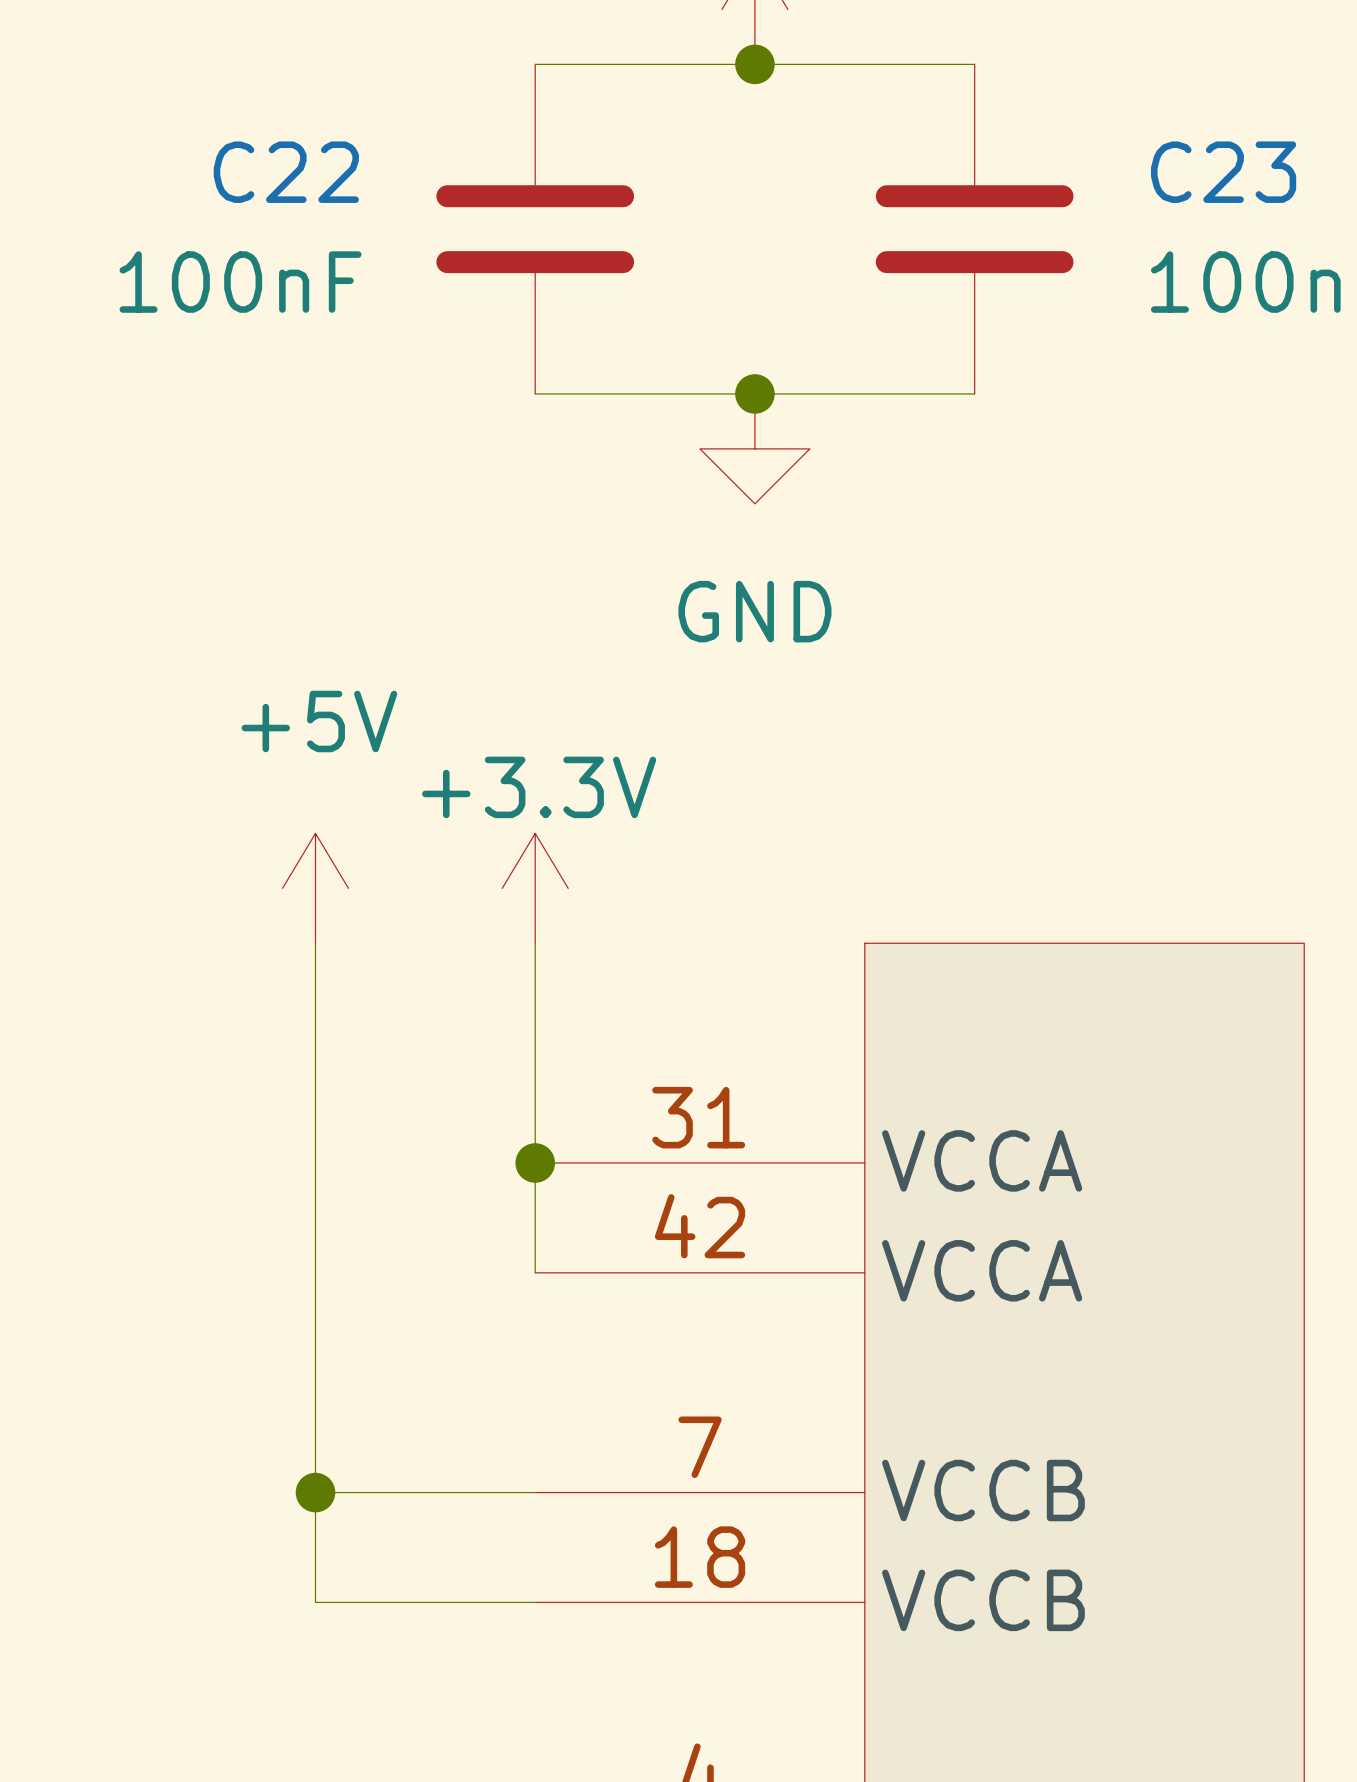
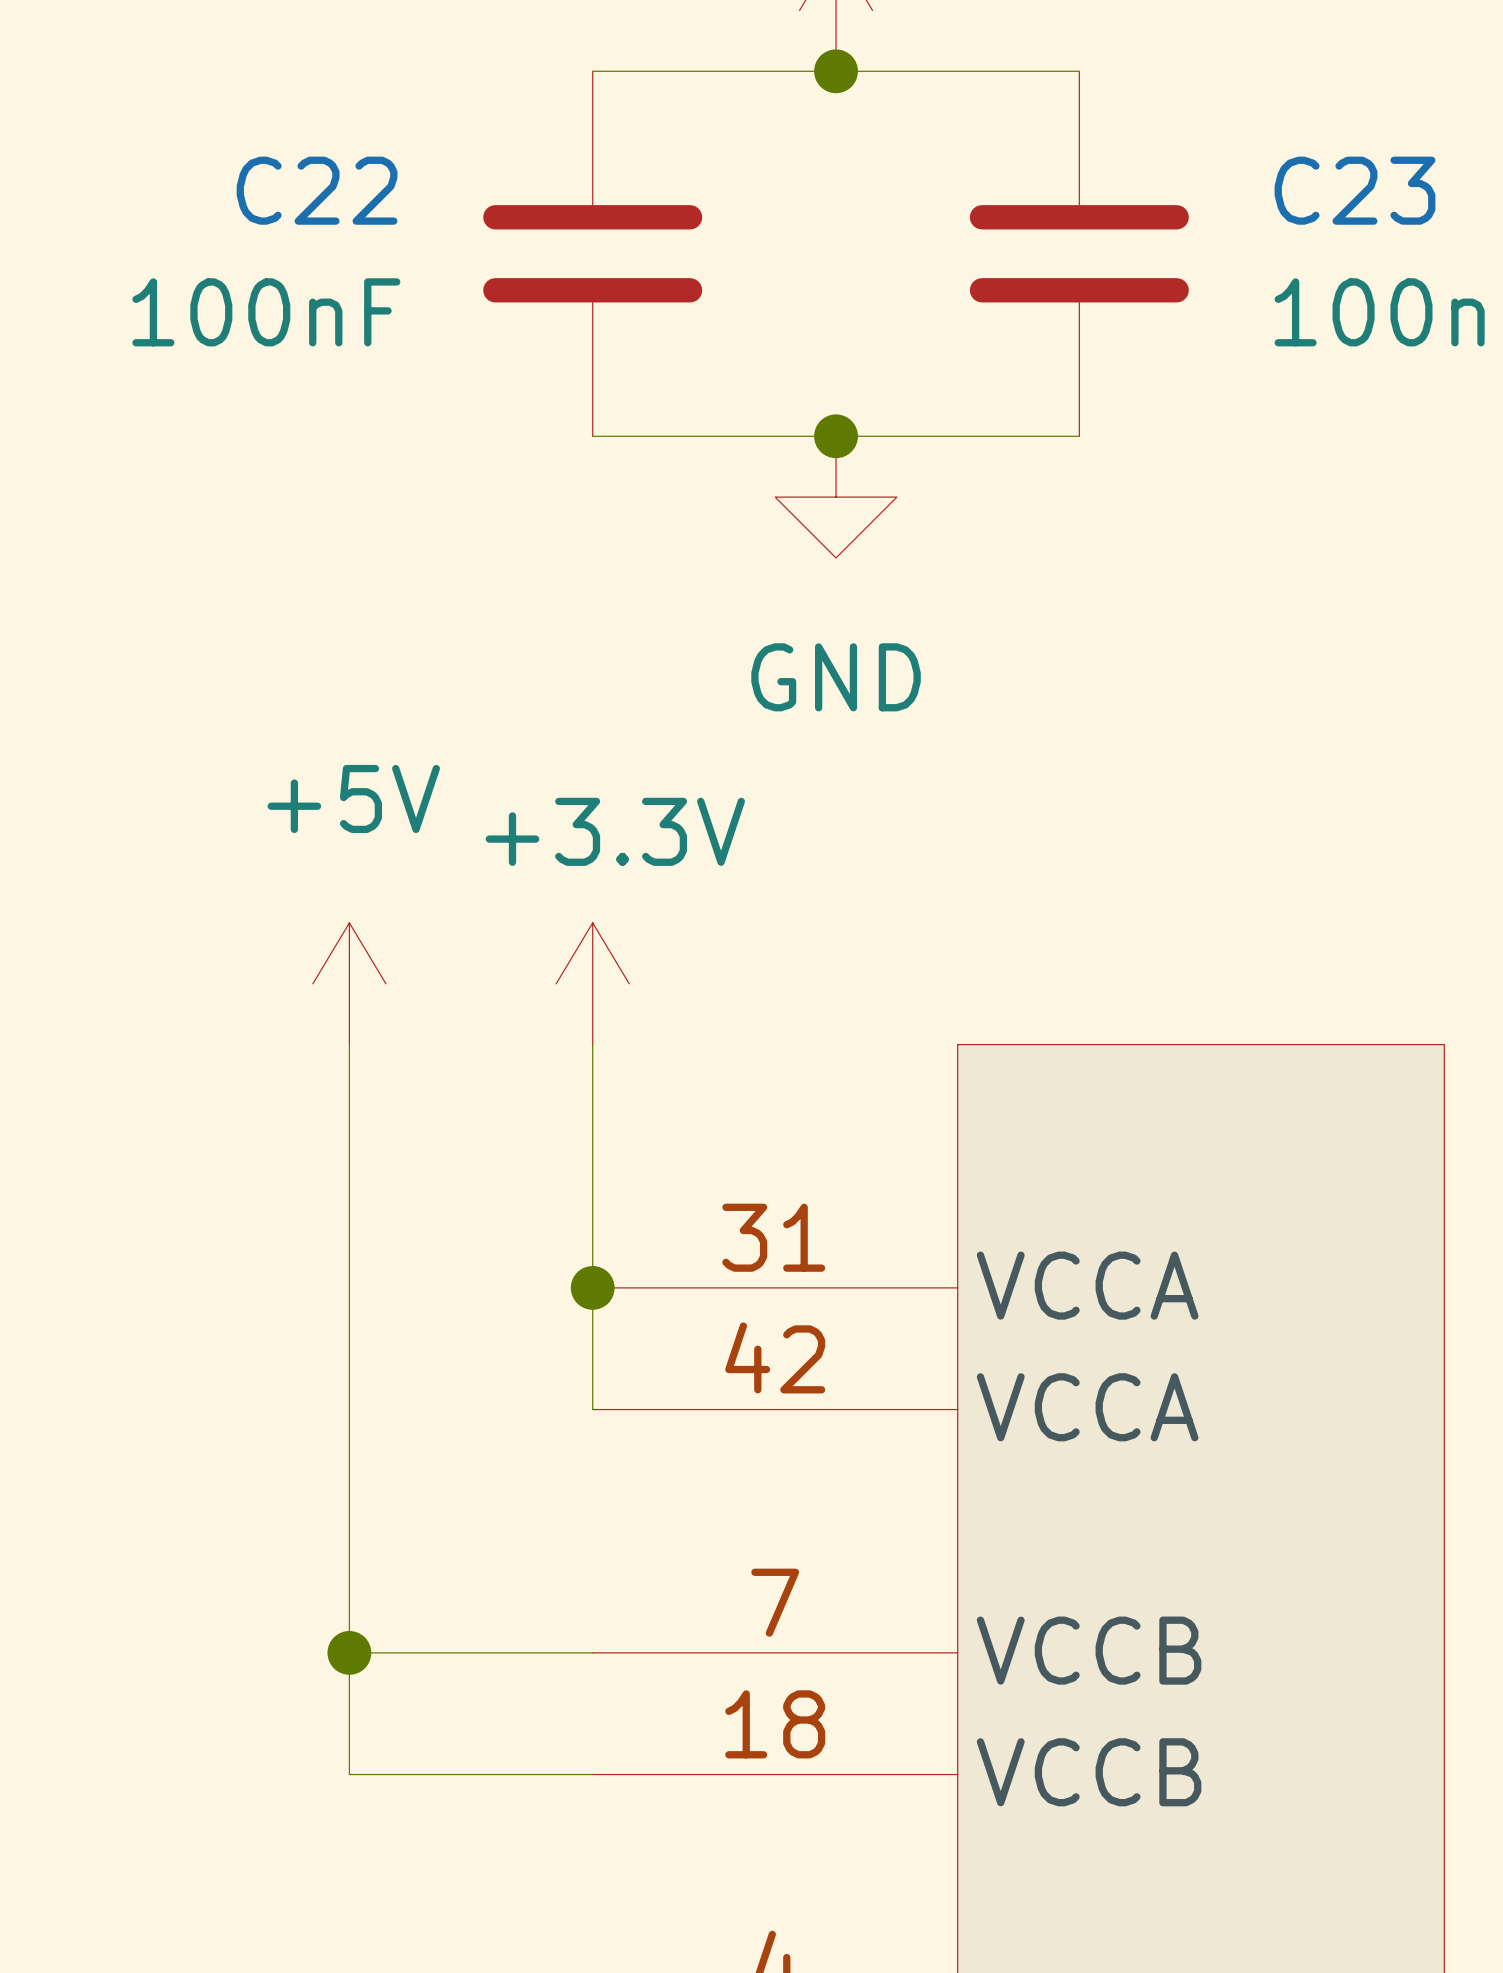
power symbol text position: +3.3V (539, 787) -> +3.3V (615, 831)

